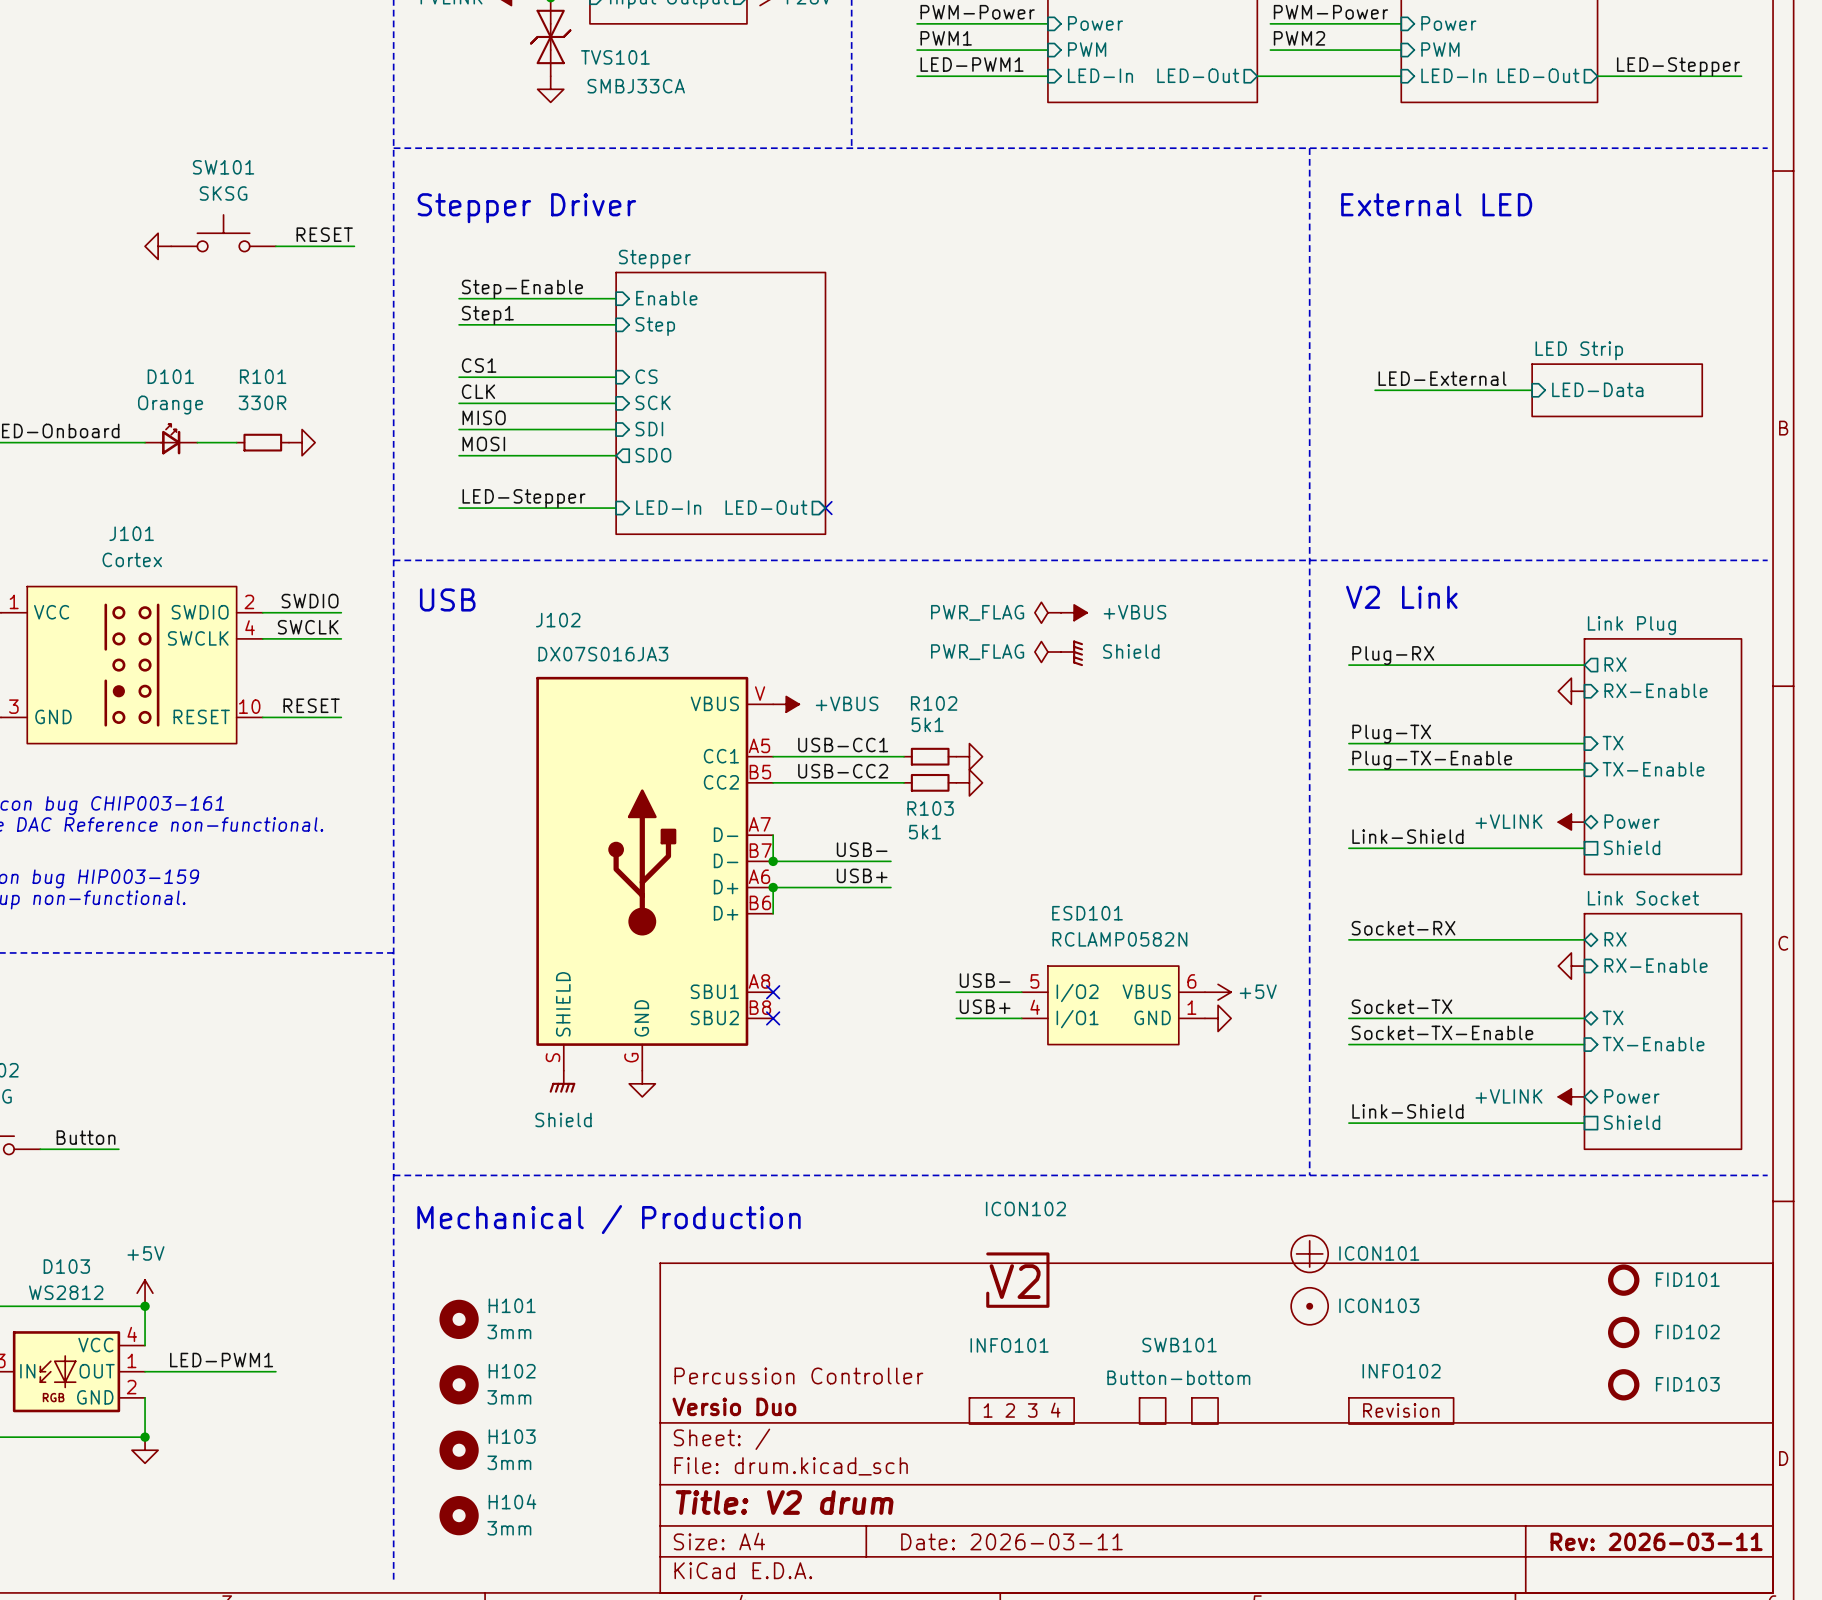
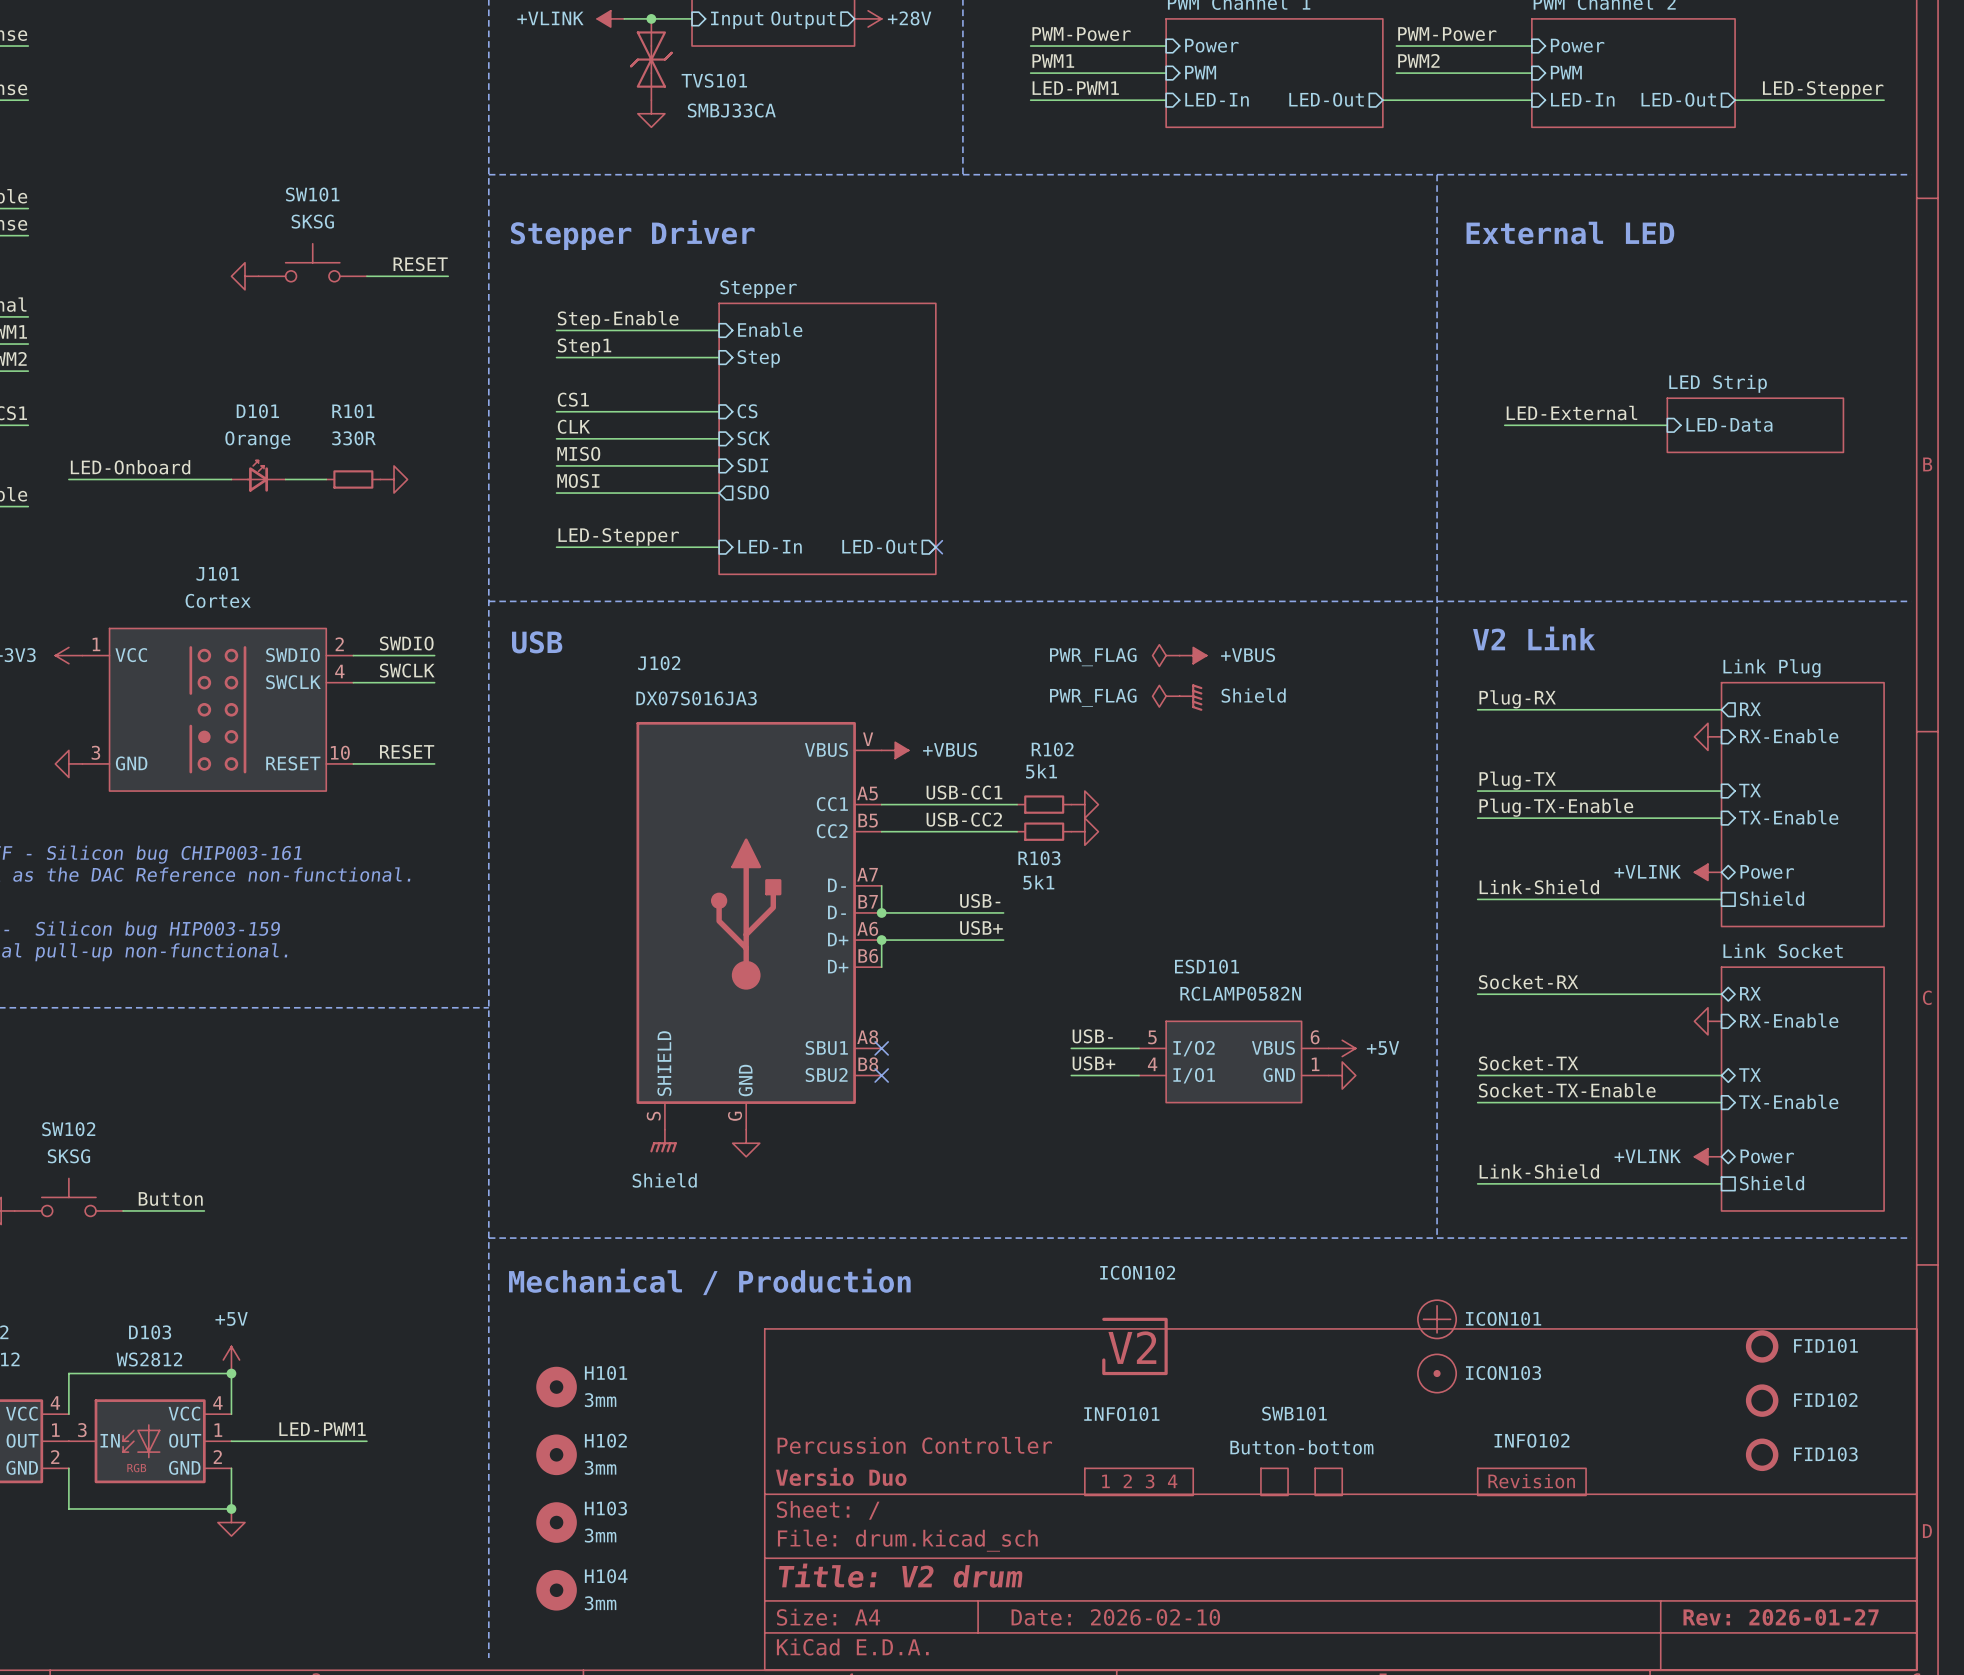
title block: Date: 2026-03-11 (1011, 1541) -> Date: 2026-02-10 (1115, 1617)
title block: Rev: 2026-03-11 (1656, 1541) -> Rev: 2026-01-27 (1781, 1617)

